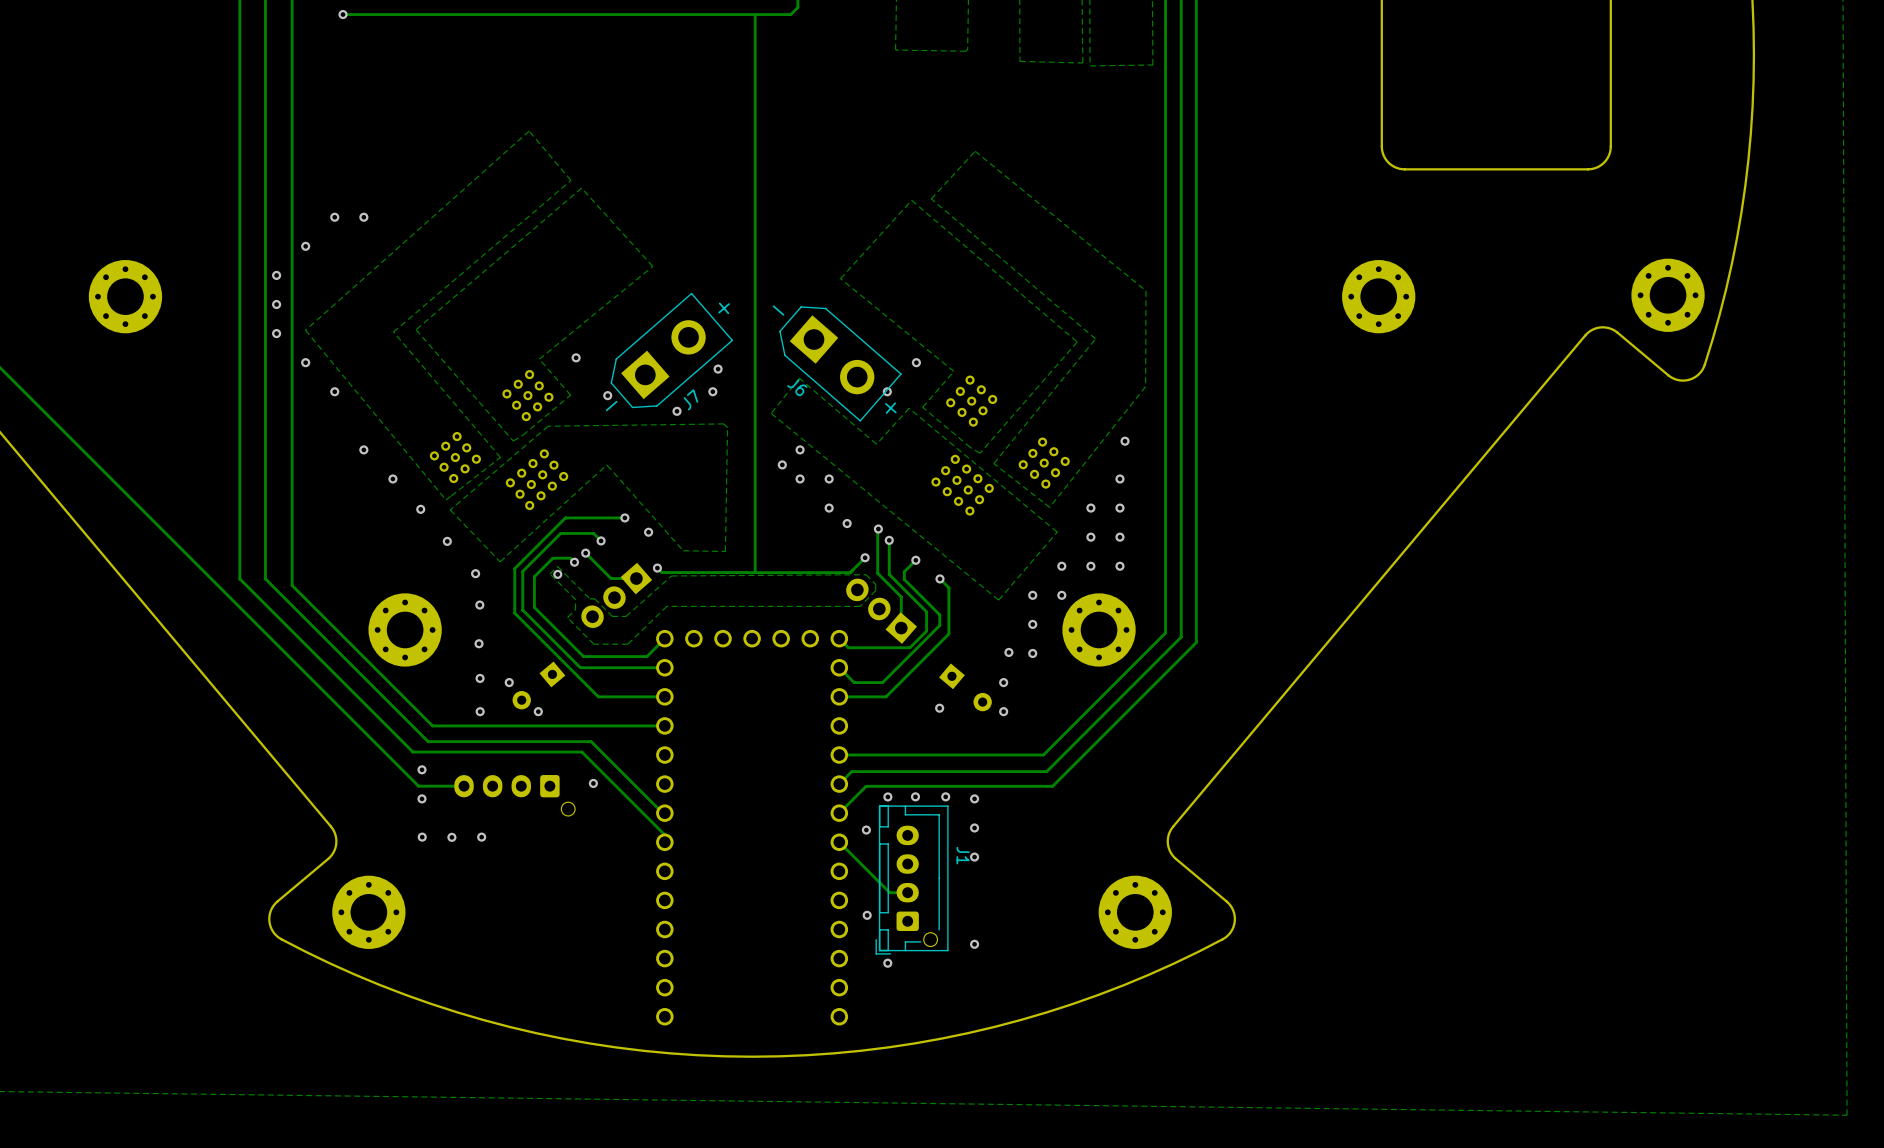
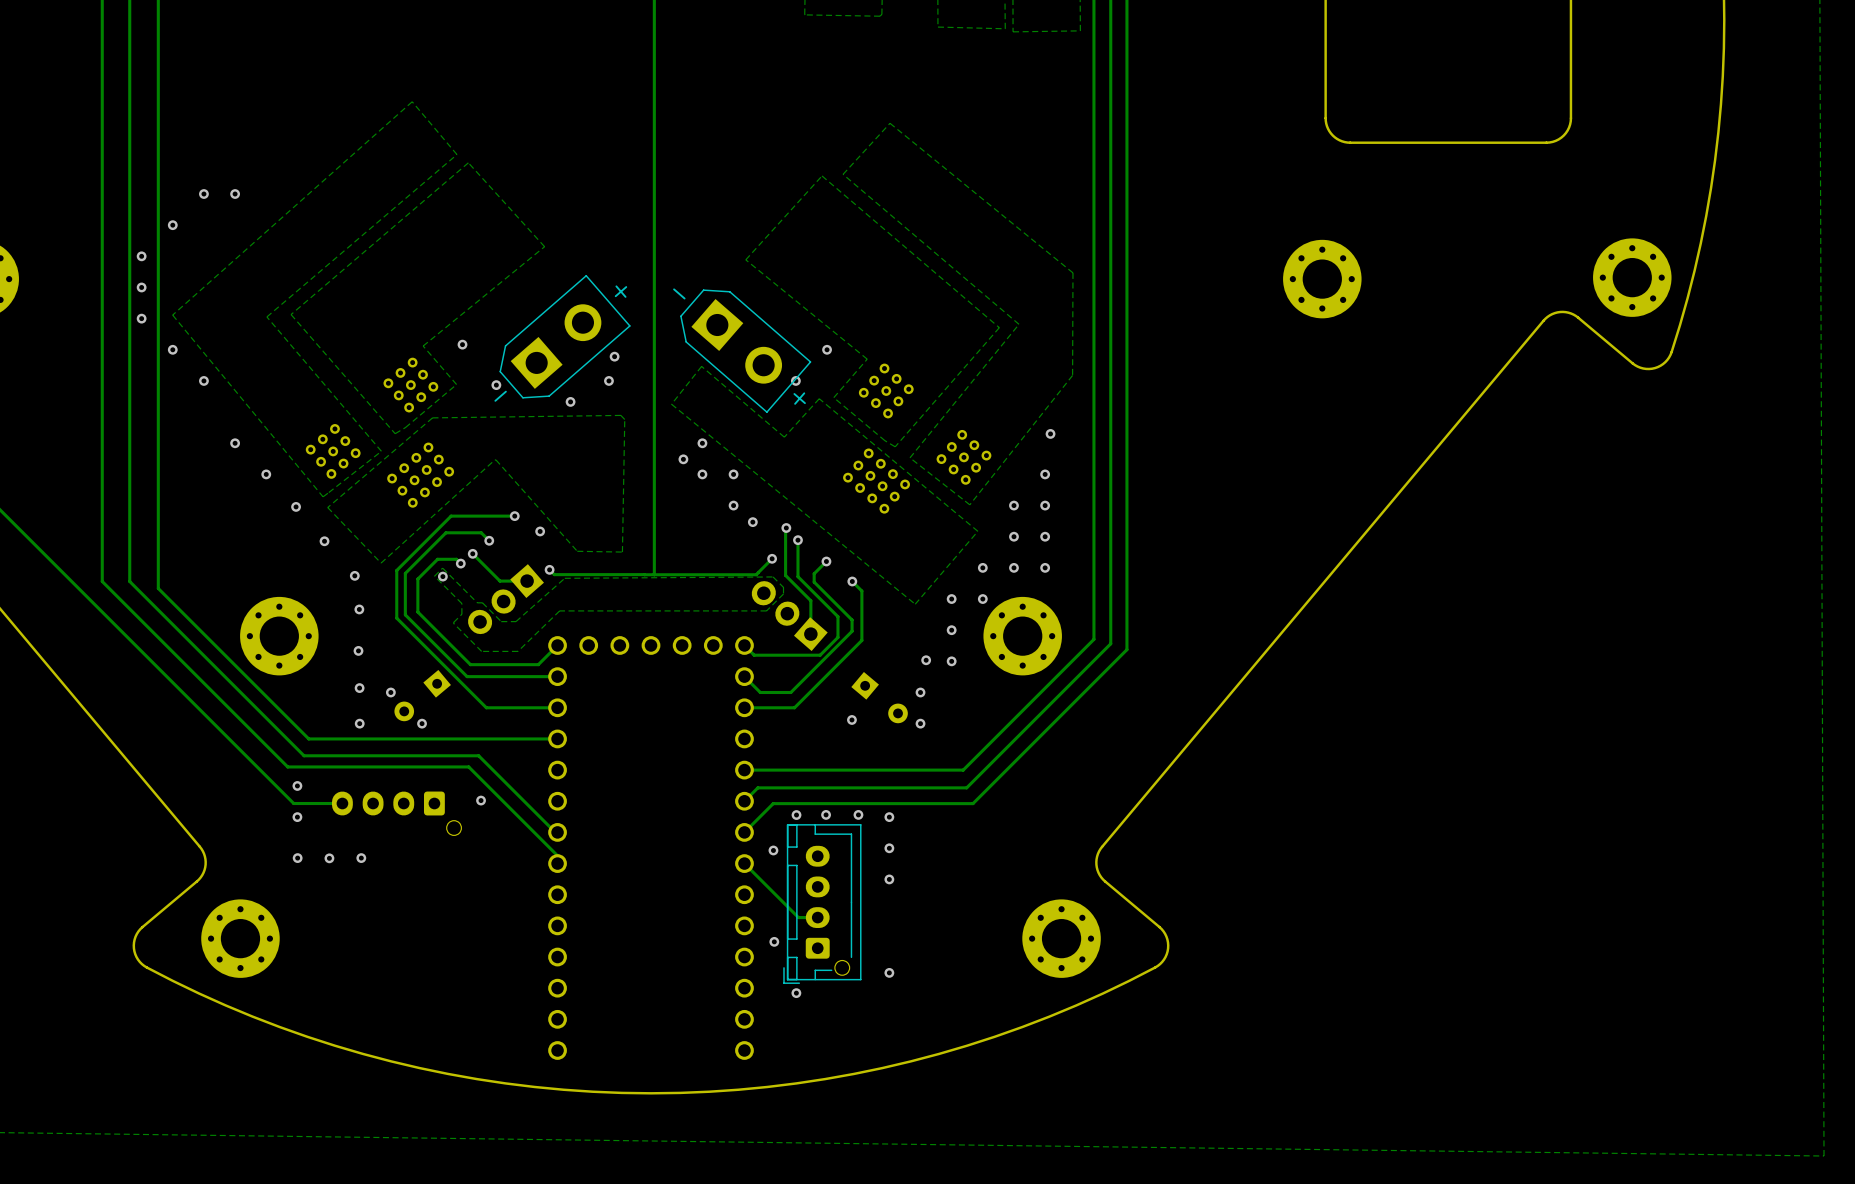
J6 name: J6 (797, 387) -> none
J7 name: J7 (690, 399) -> none
J1 name: J1 (963, 855) -> none

